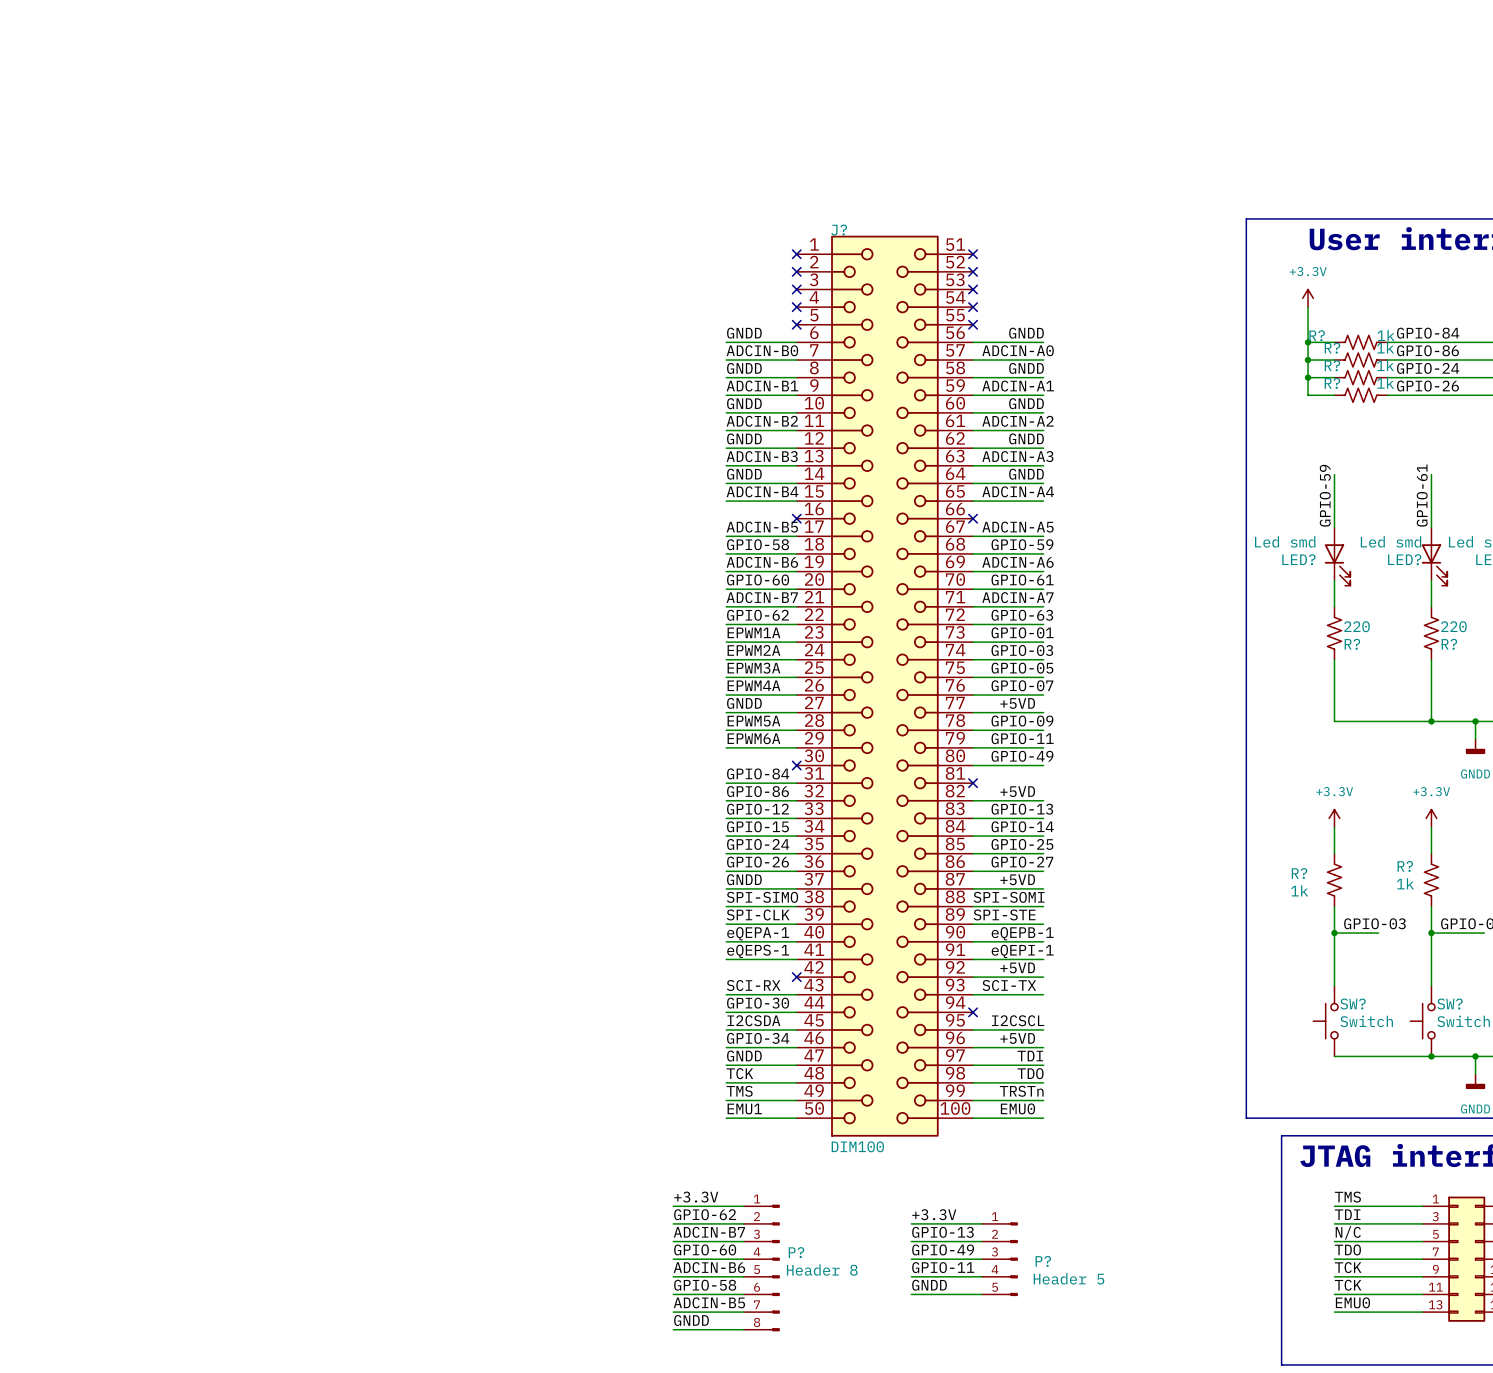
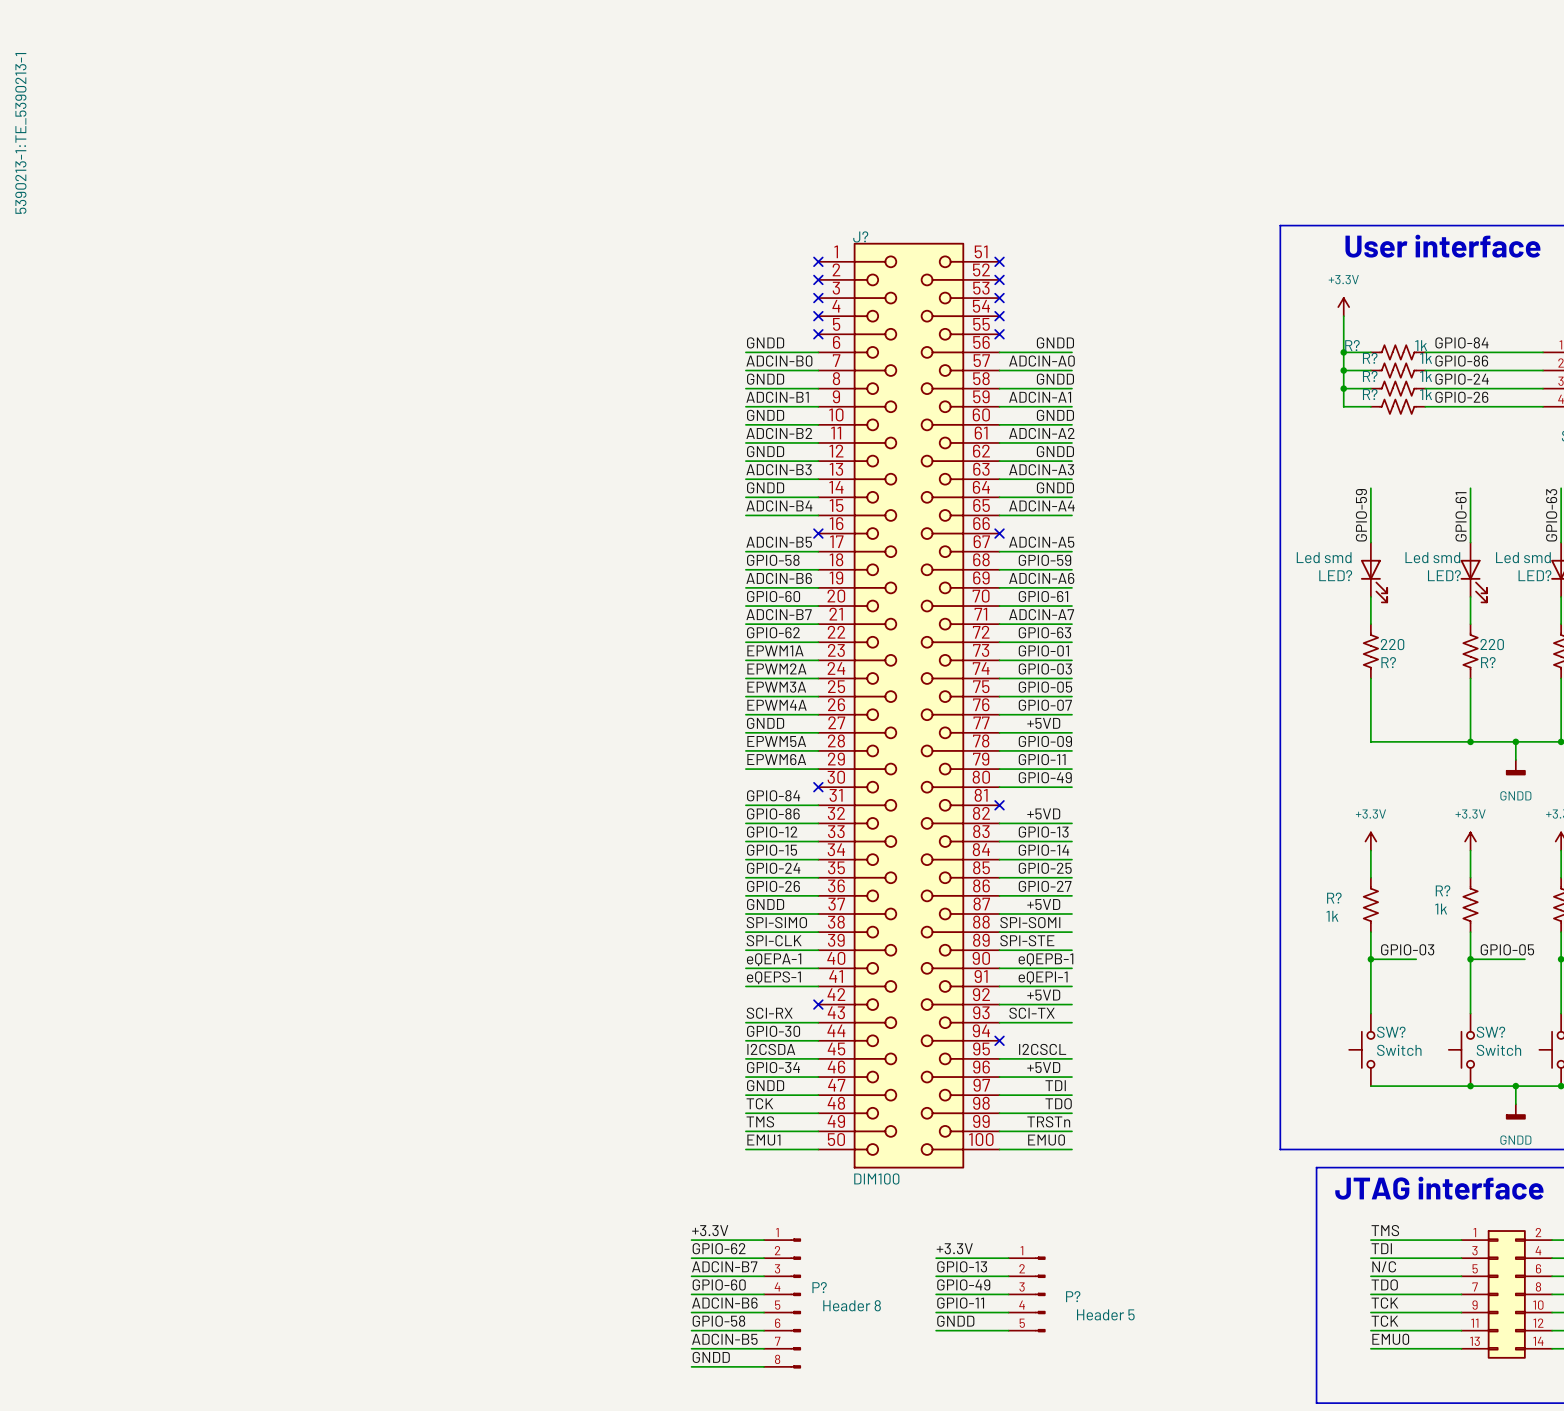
J? text: none -> 5390213-1:TE_5390213-1 (20, 133)

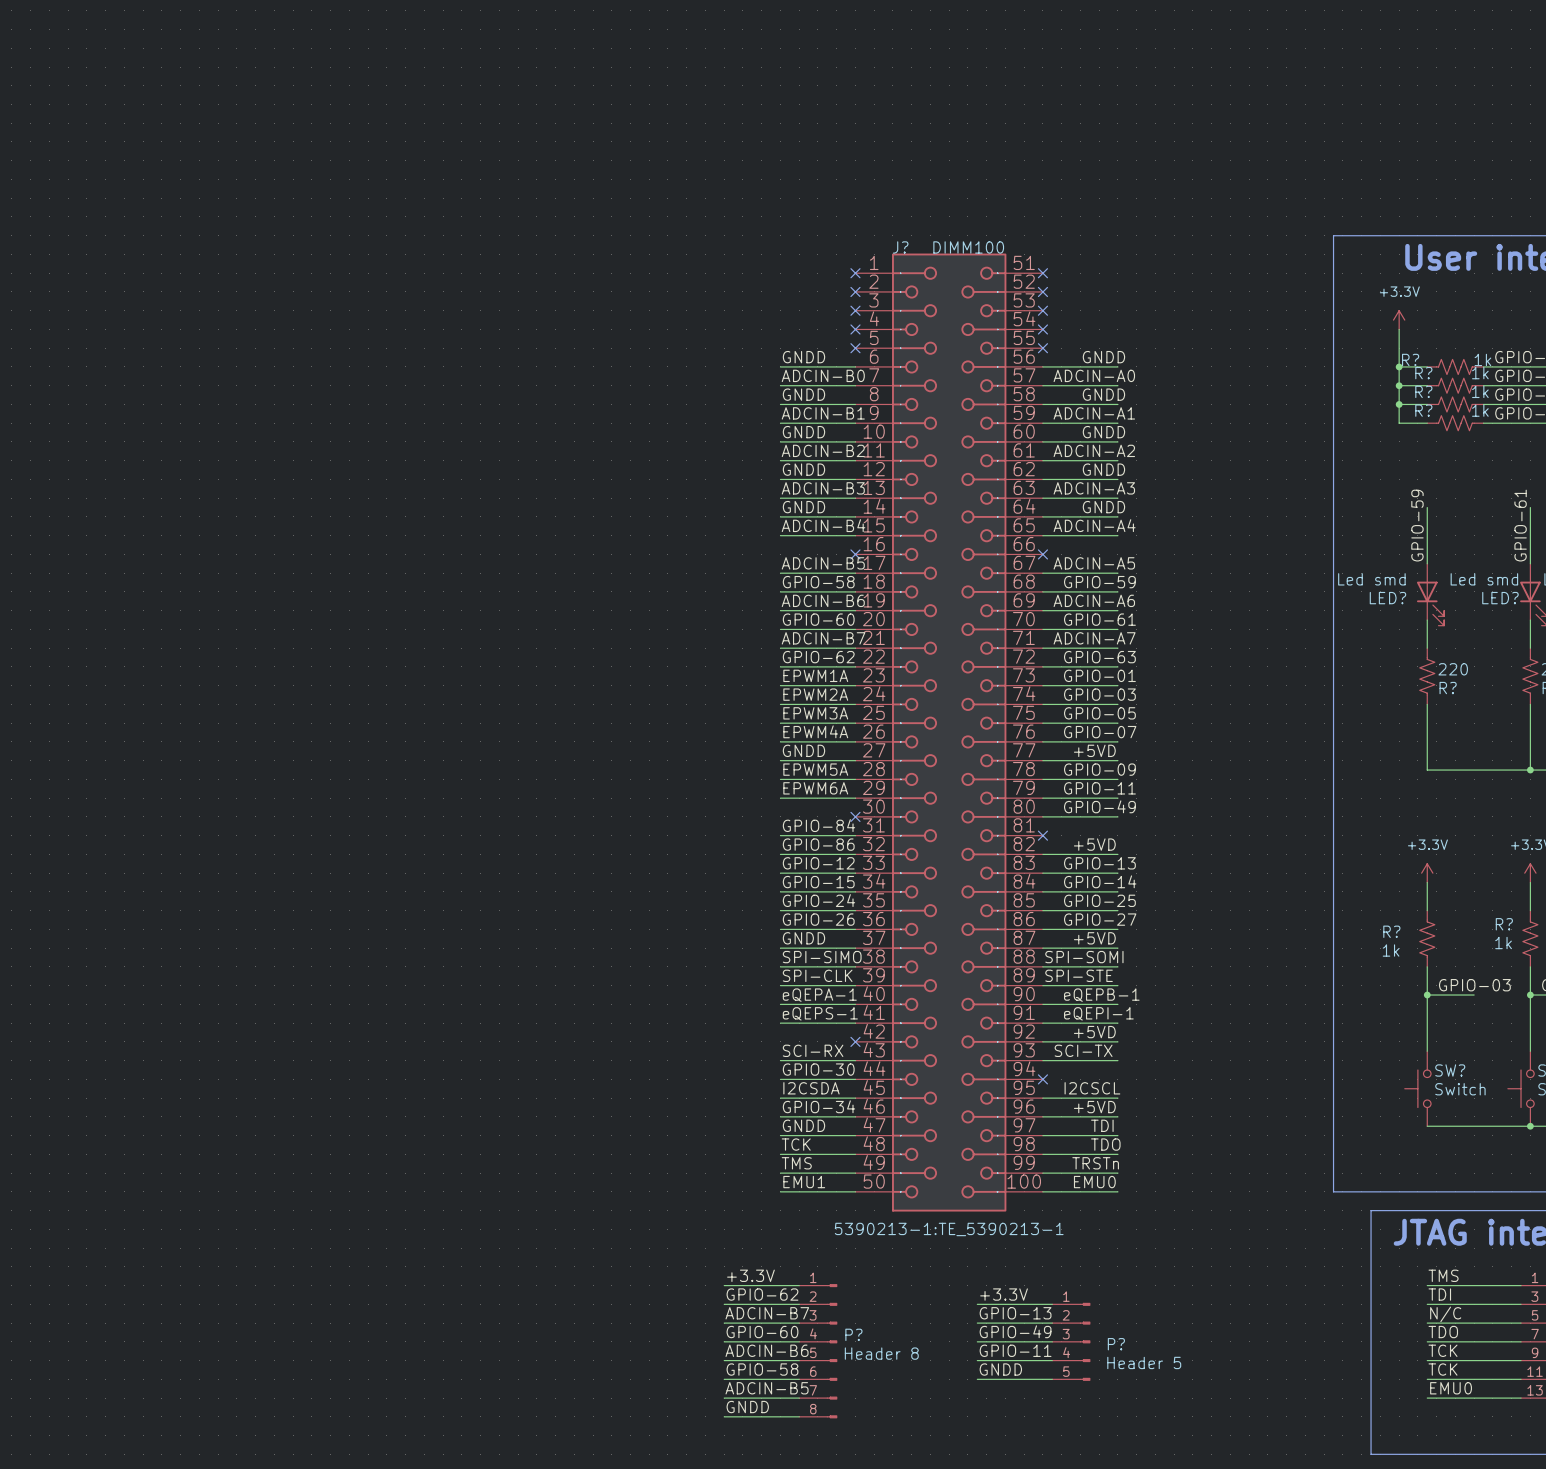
J? text rotation: 0° (20, 133) -> 90° clockwise (949, 1229)
J? text position: 5390213-1:TE_5390213-1 (20, 133) -> 5390213-1:TE_5390213-1 (949, 1229)
J? value: DIM100 (876, 1178) -> DIMM100 (968, 247)

